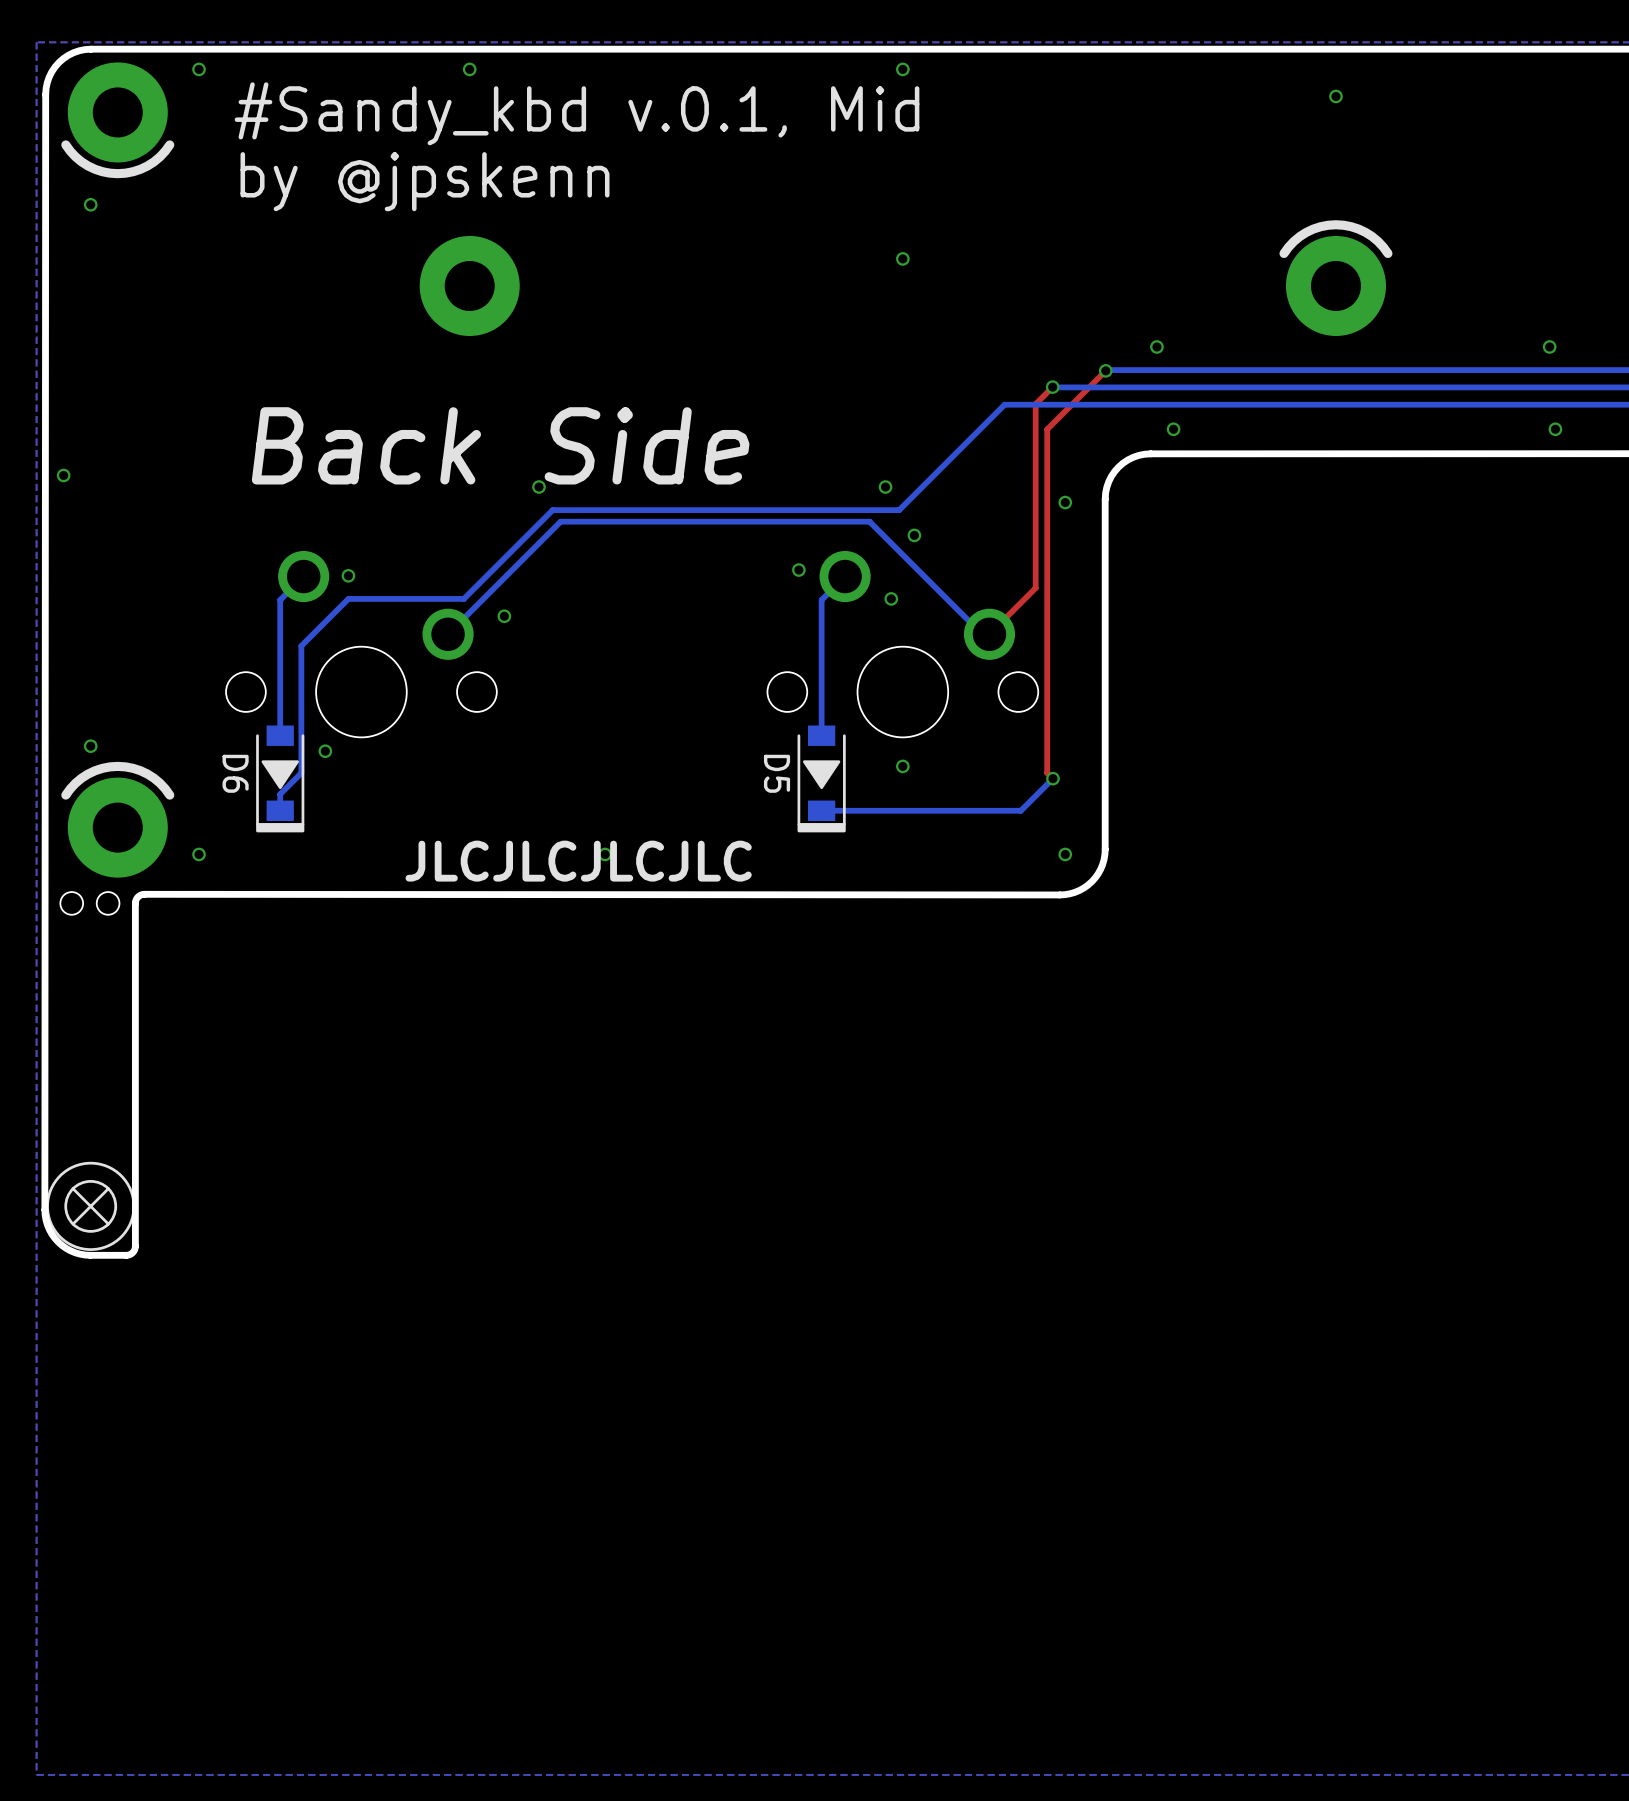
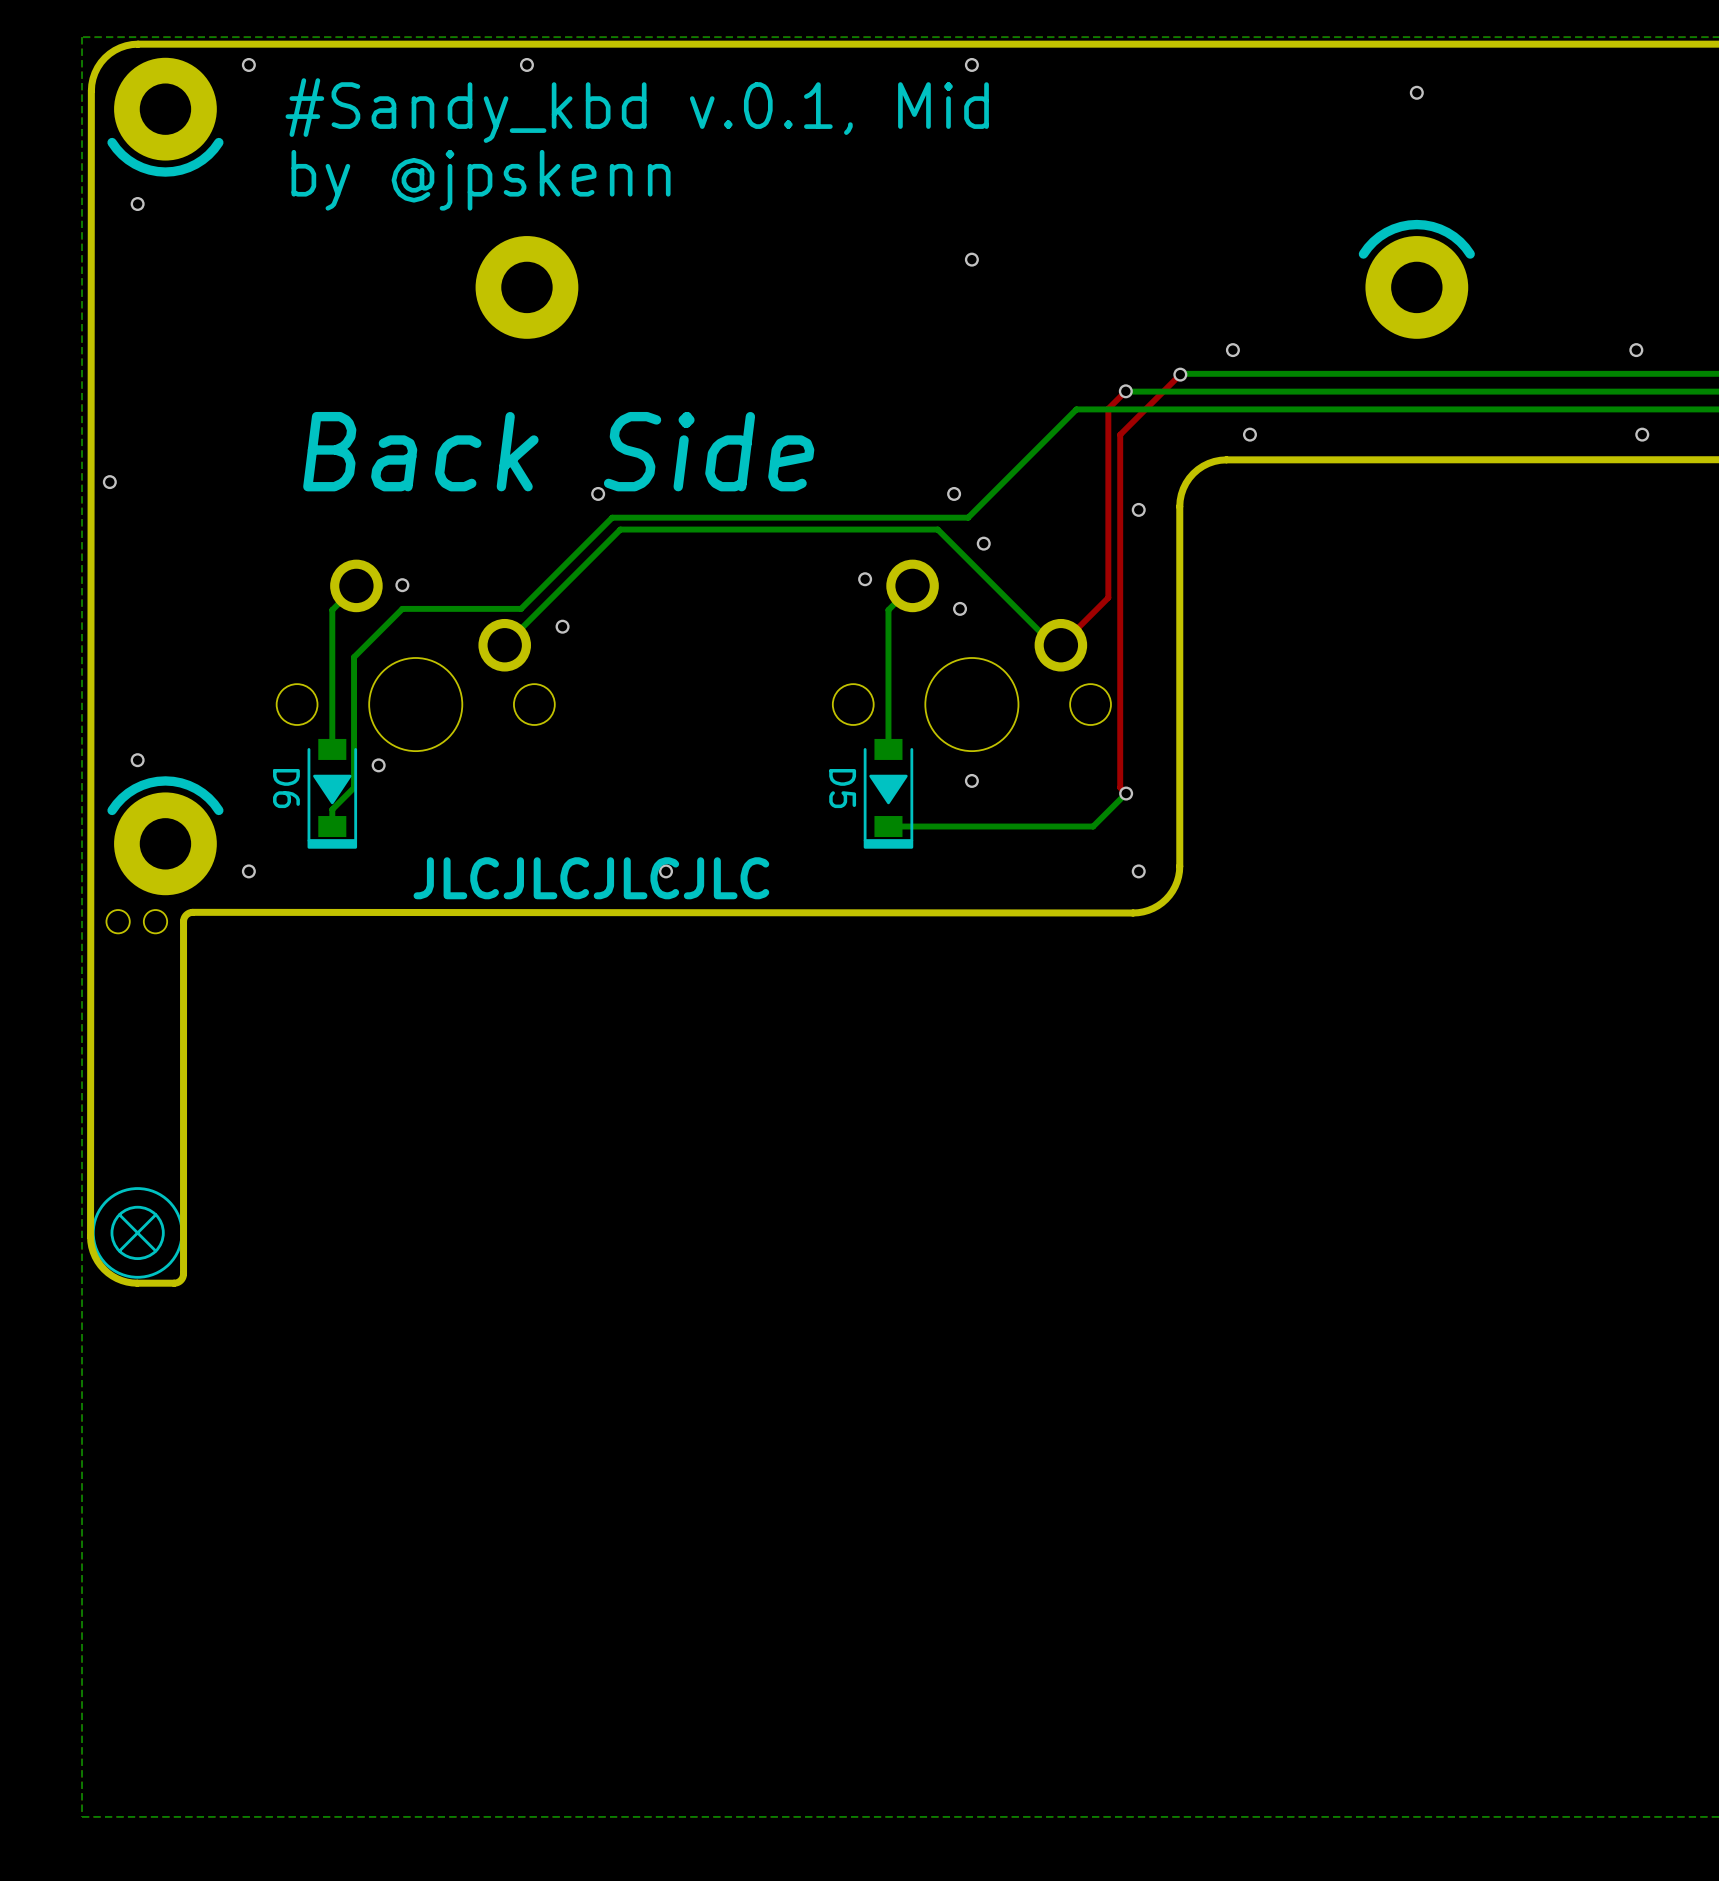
text position: JLCJLCJLCJLC (578, 861) -> JLCJLCJLCJLC (591, 878)

